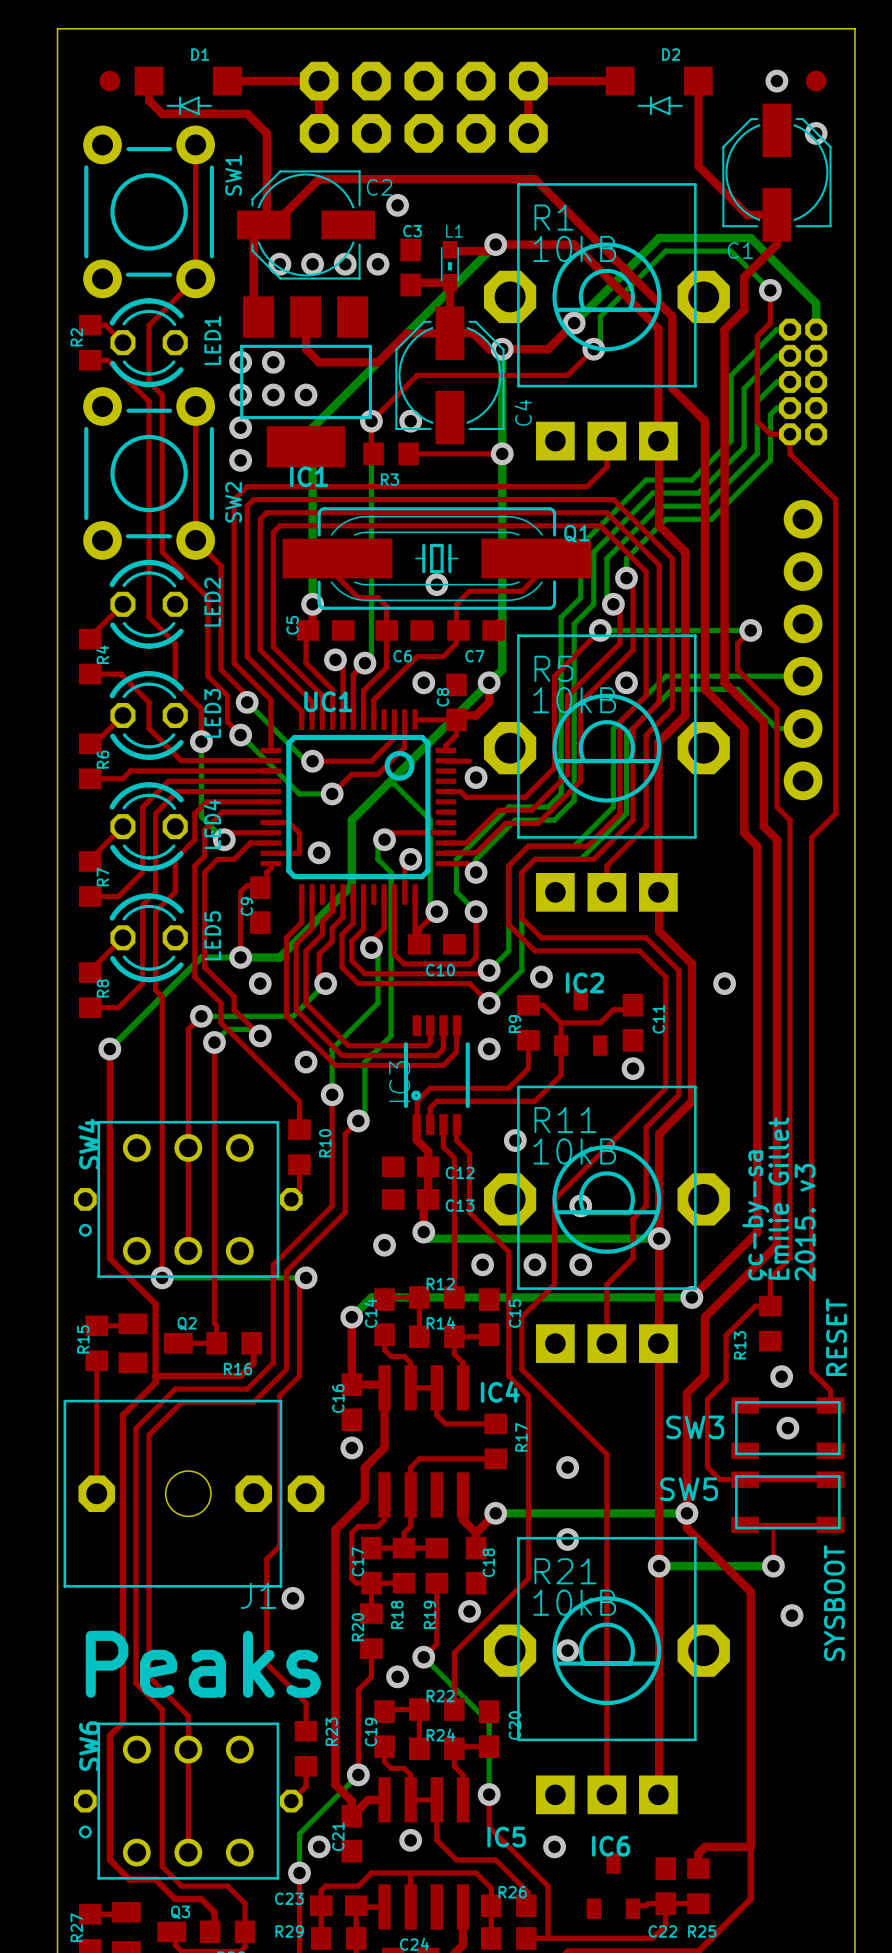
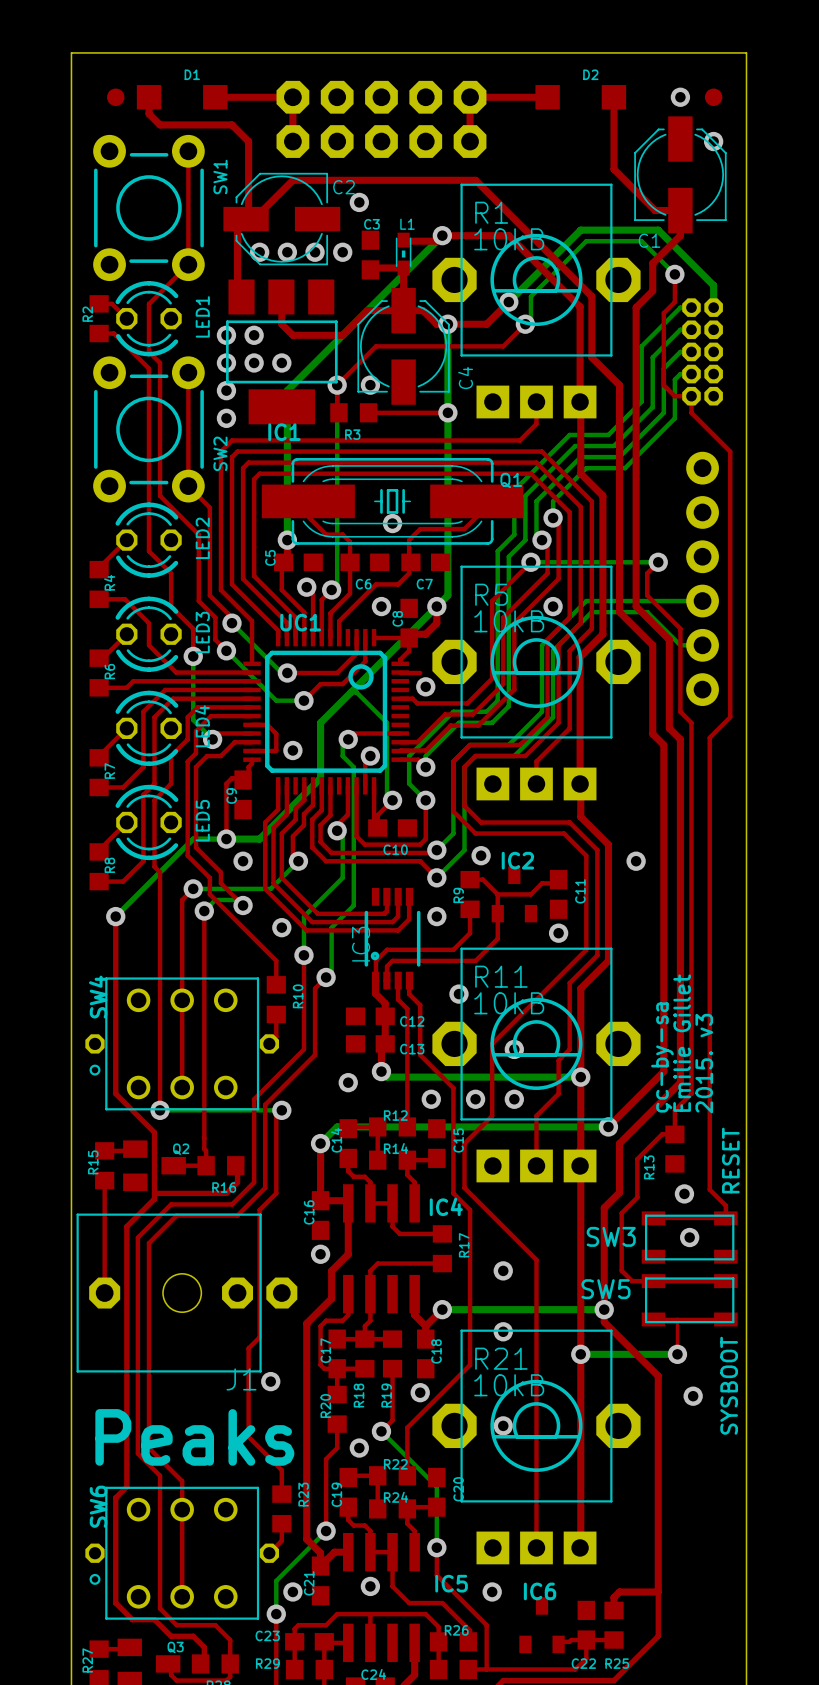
D1 footprint: [134, 66, 242, 116] -> [136, 85, 228, 110]
D2 footprint: [605, 66, 713, 116] -> [535, 85, 627, 110]

